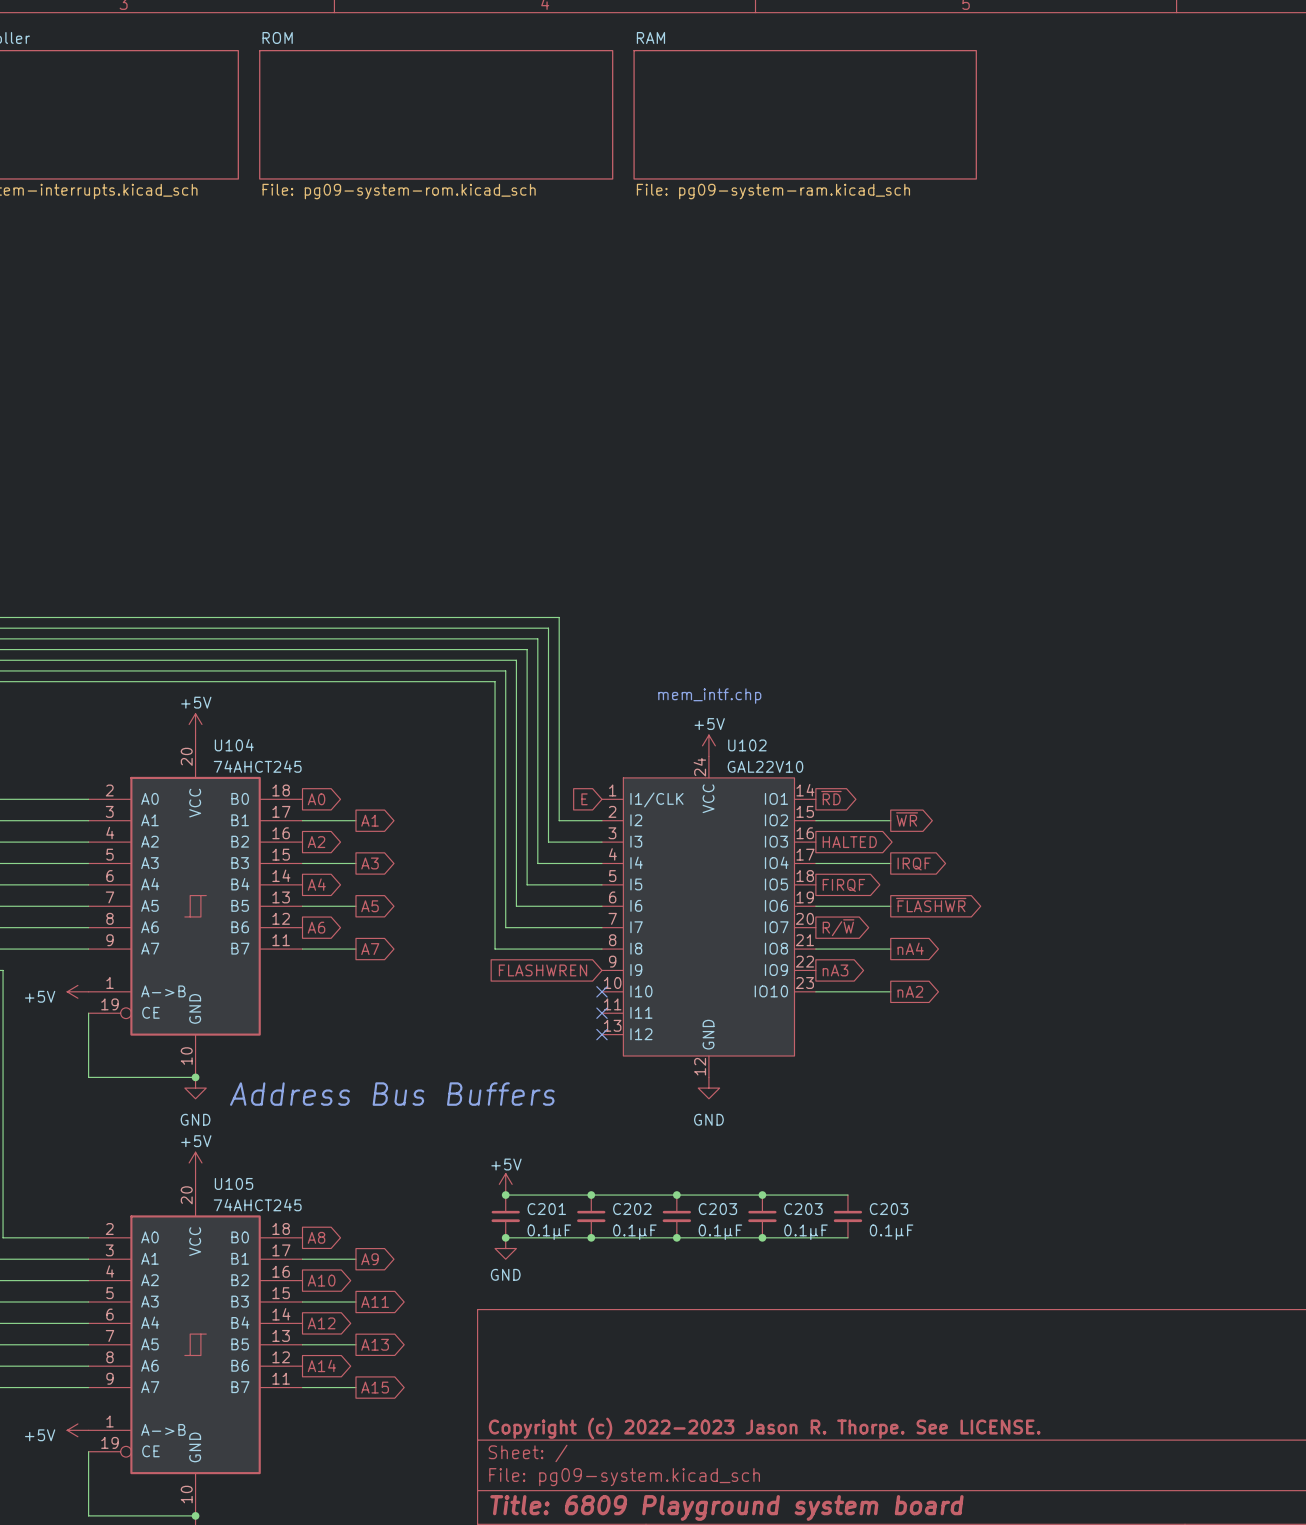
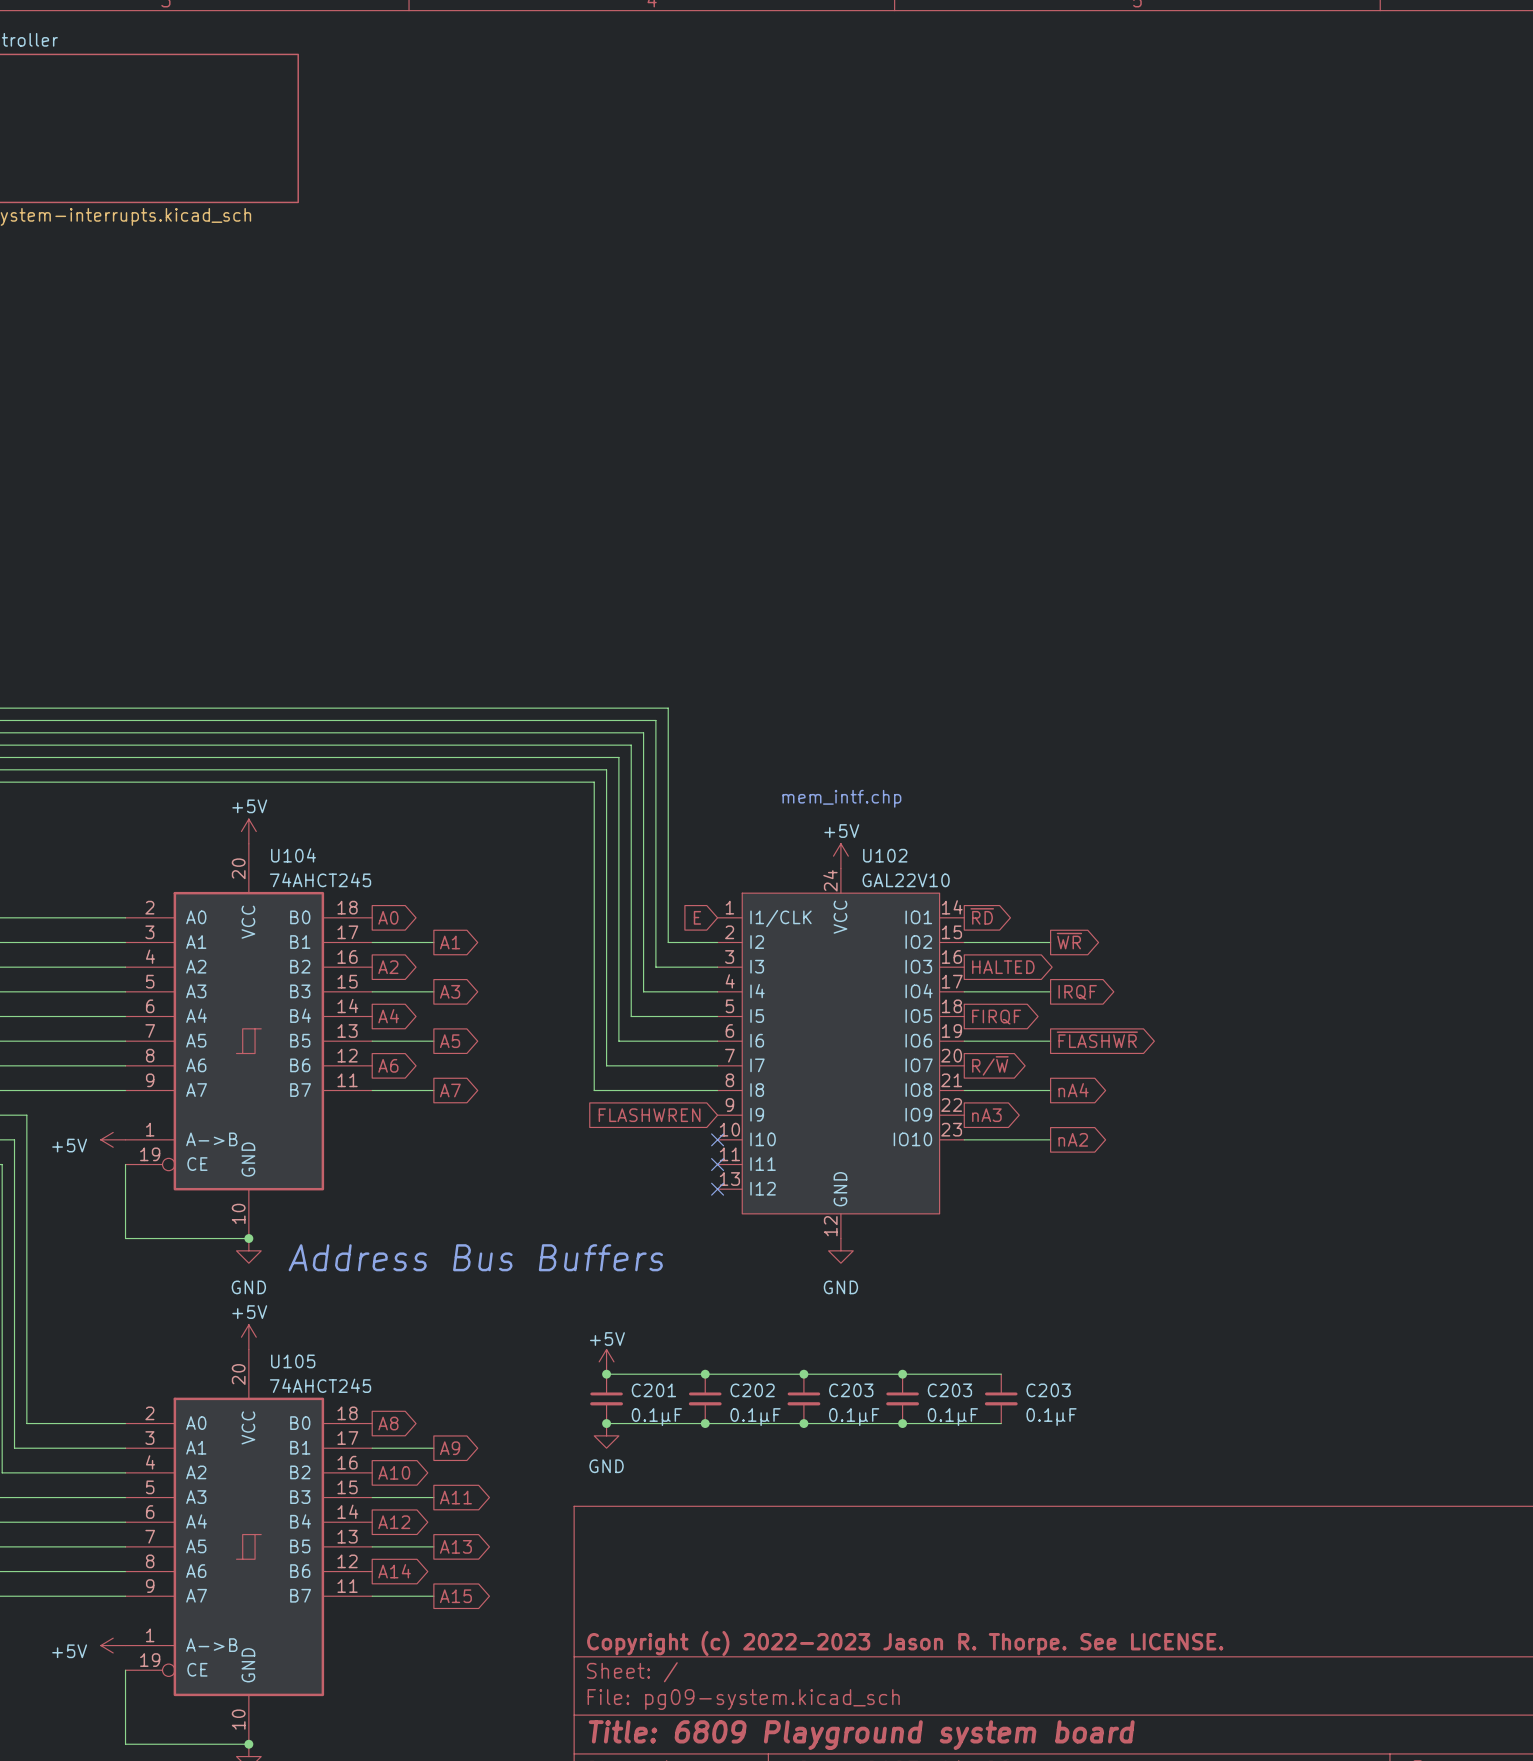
sheet ROM: File: pg09-system-rom.kicad_sch (436, 114) -> none
sheet RAM: File: pg09-system-ram.kicad_sch (805, 114) -> none

